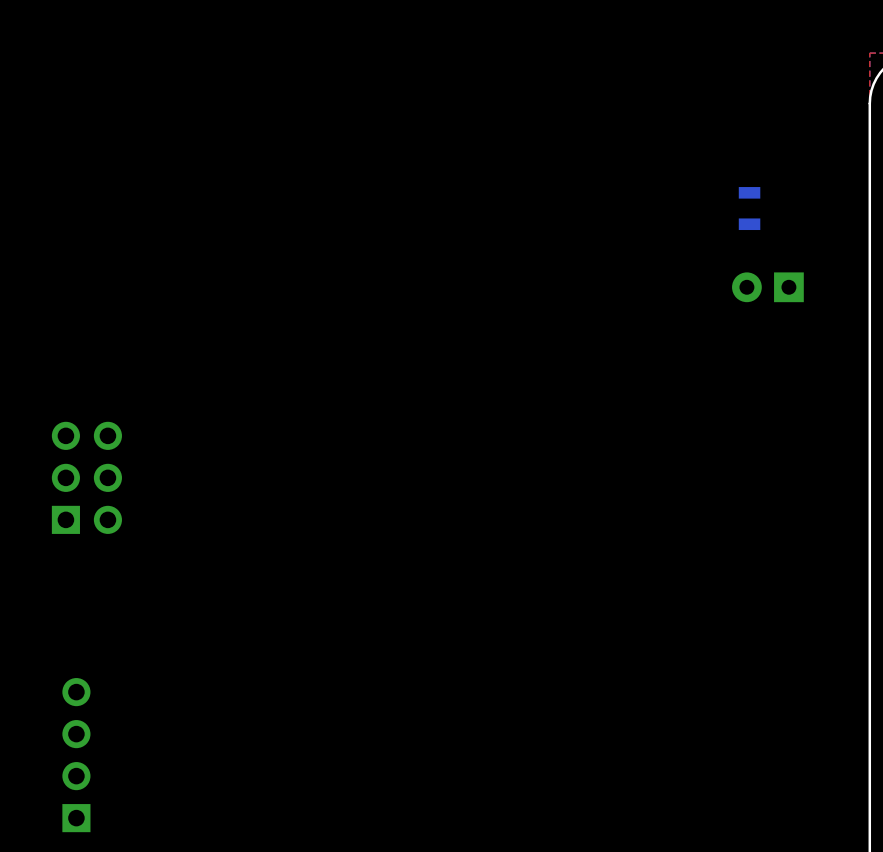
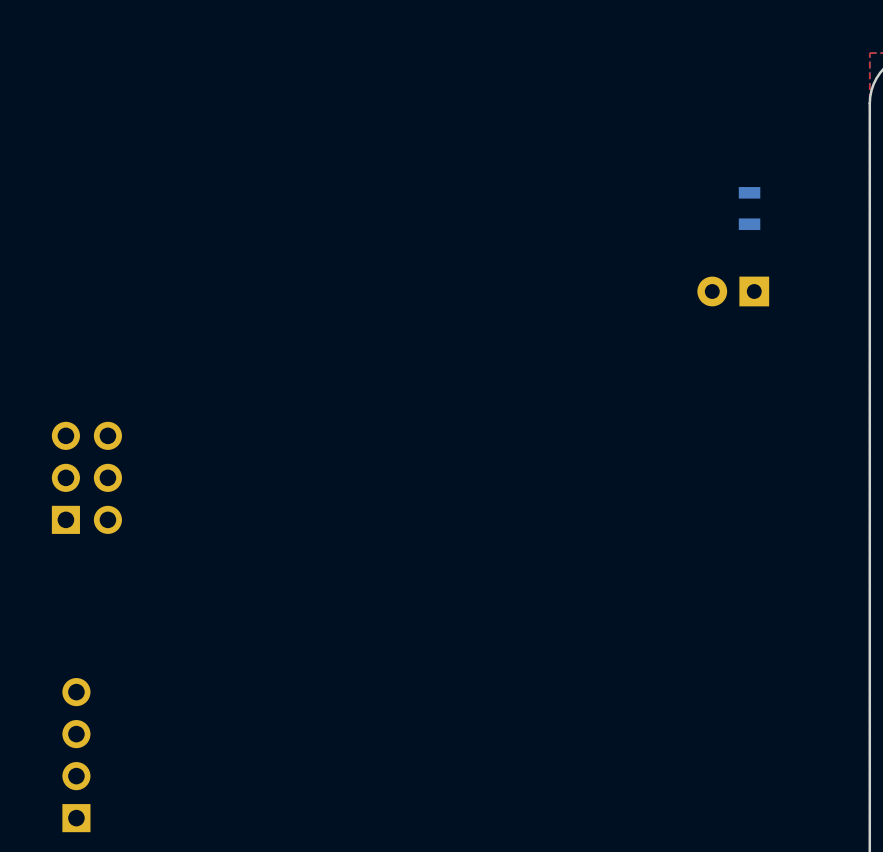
part position: (767, 287) -> (733, 291)

